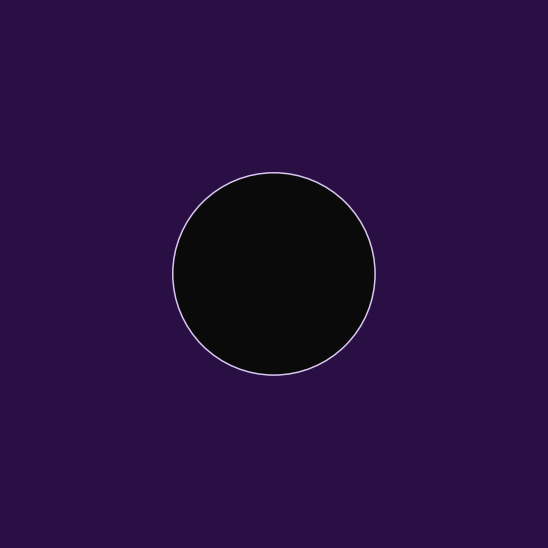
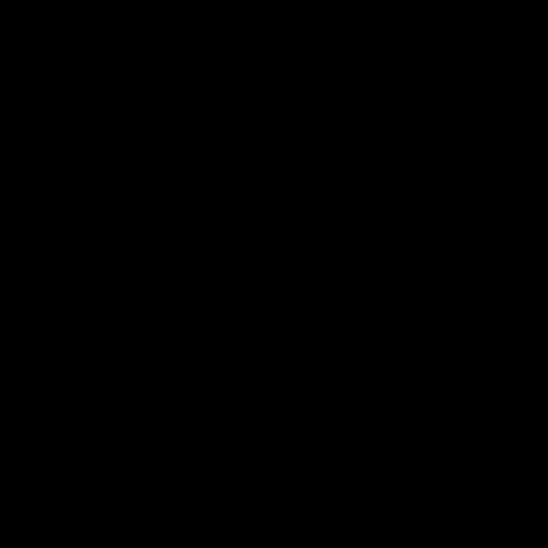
part: (273, 273) -> none

